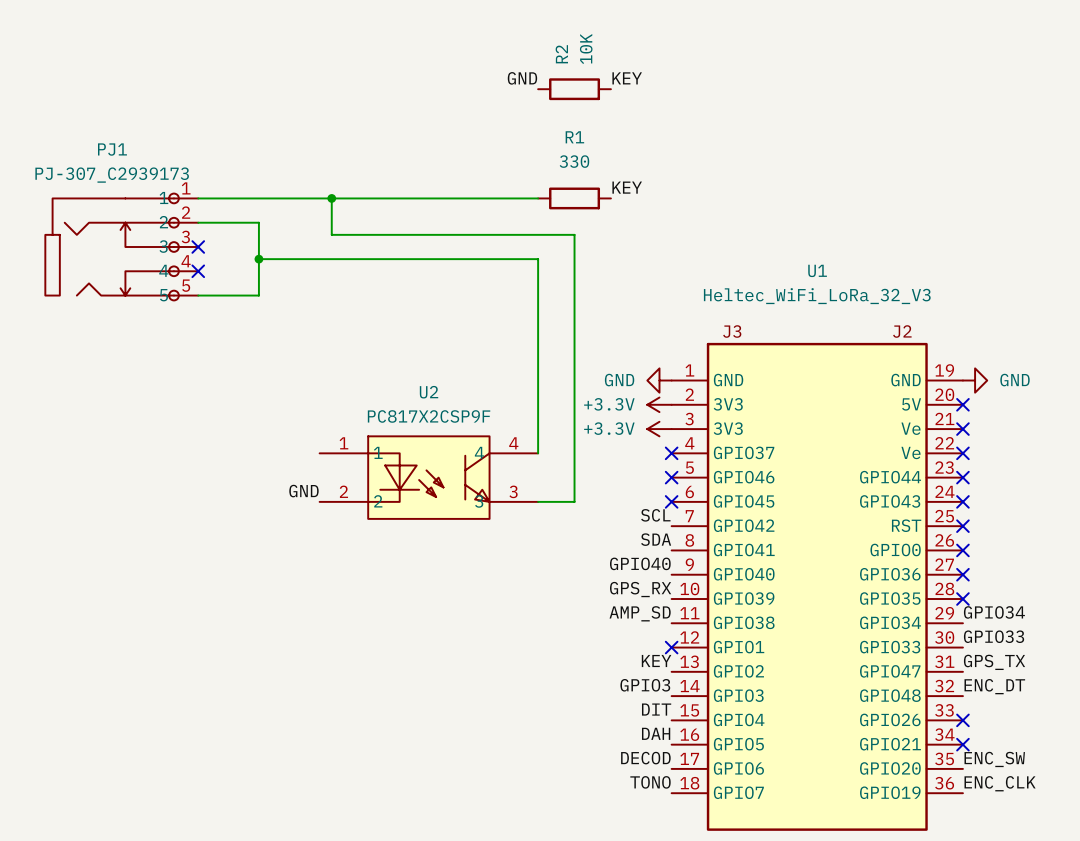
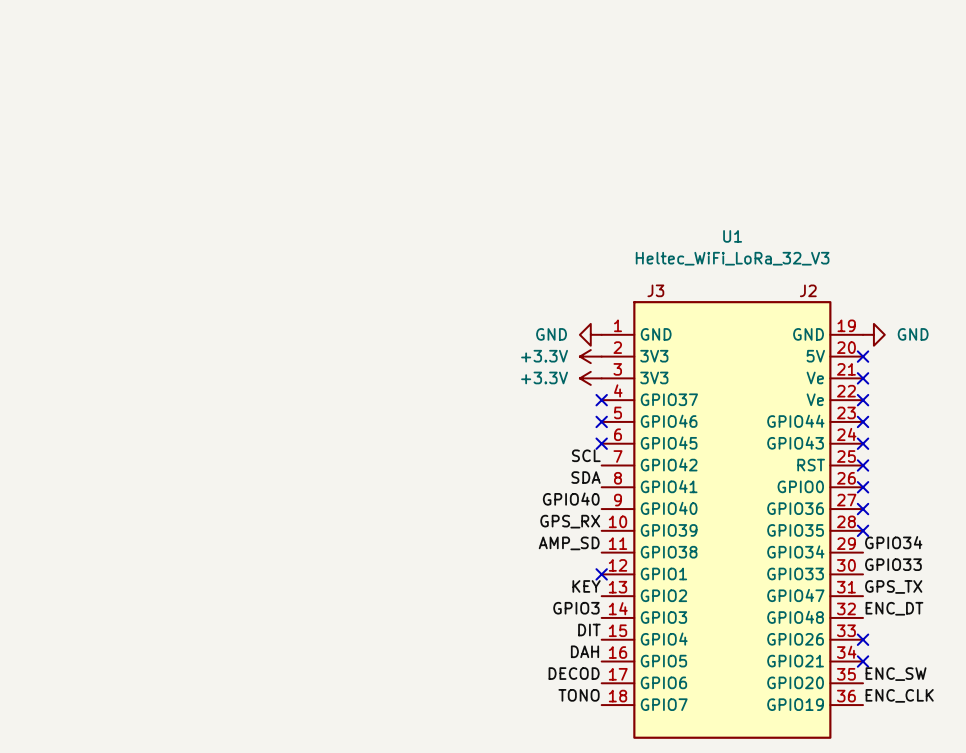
label: GND (522, 78) -> none
label: KEY (627, 78) -> none
R2: 10K (574, 89) -> none
label: KEY (627, 187) -> none
wire: (198, 198) (538, 198) -> none
wire: (331, 198) (331, 234) (574, 234) (574, 501) (538, 501) -> none
junction: (331, 198) -> none
R1: 330 (574, 198) -> none
wire: (198, 222) (258, 222) (258, 295) (198, 295) -> none
PJ1: PJ-307_C2939173 (121, 247) -> none
no-connect mark: (198, 247) -> none
wire: (258, 259) (538, 259) (538, 453) -> none
junction: (258, 259) -> none
no-connect mark: (198, 271) -> none
U2: PC817X2CSP9F (428, 477) -> none
label: GND (303, 491) -> none

